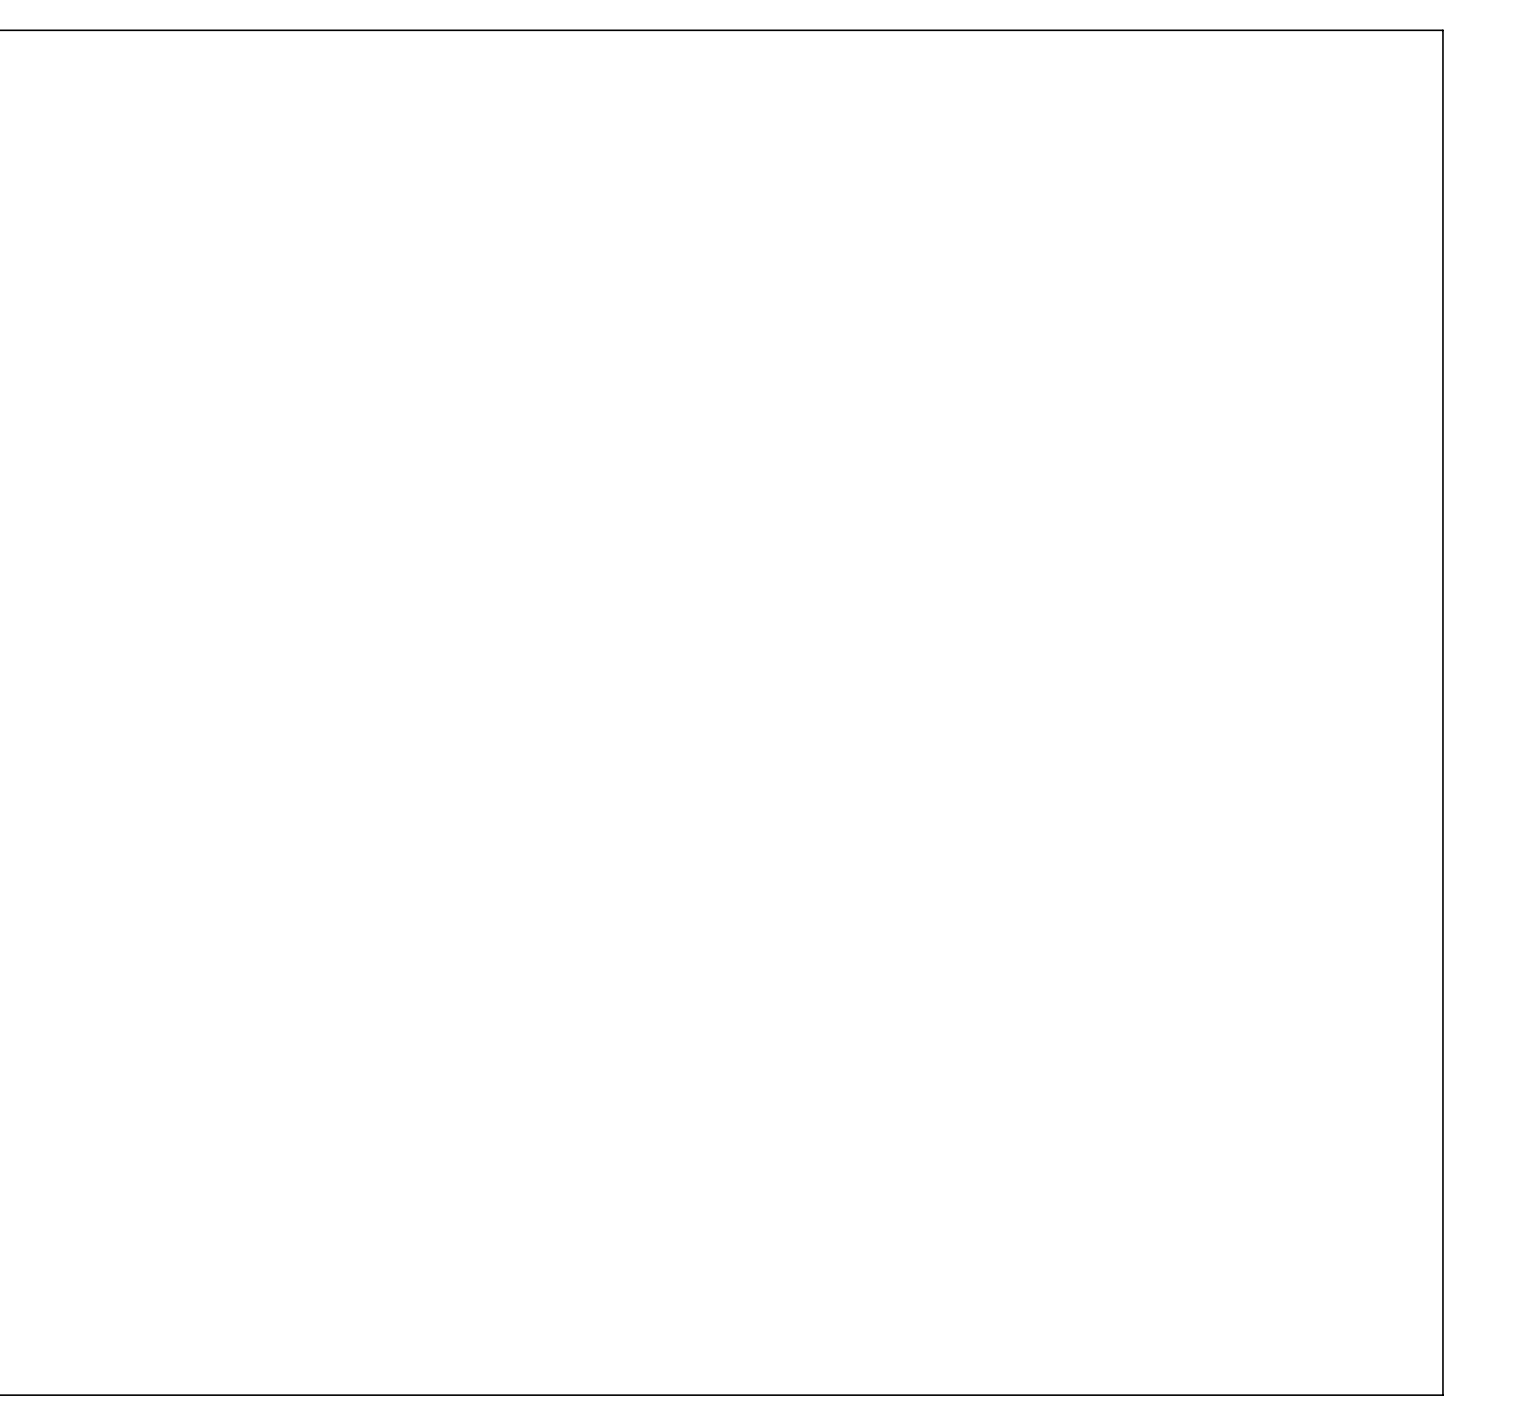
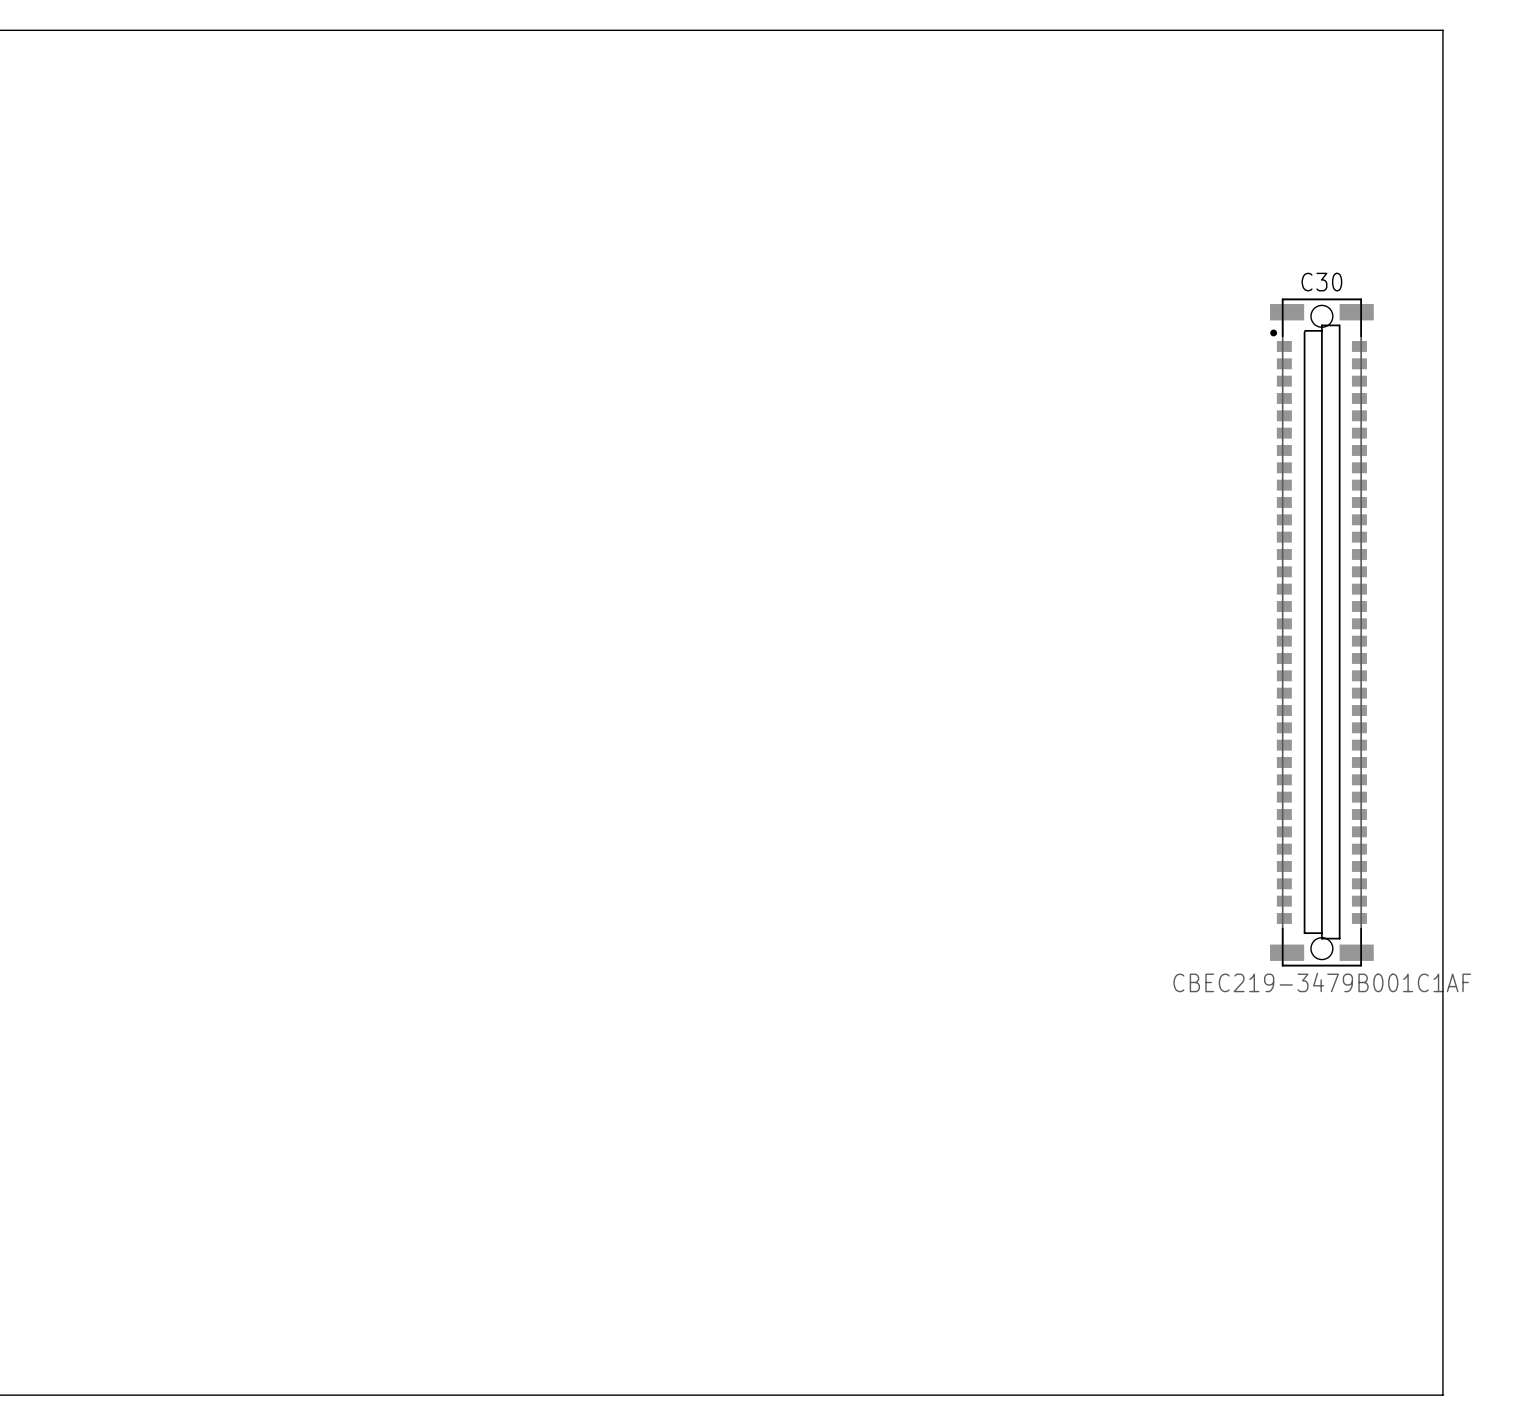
C30: none -> CBEC219-3479B001C1AF (1321, 632)

